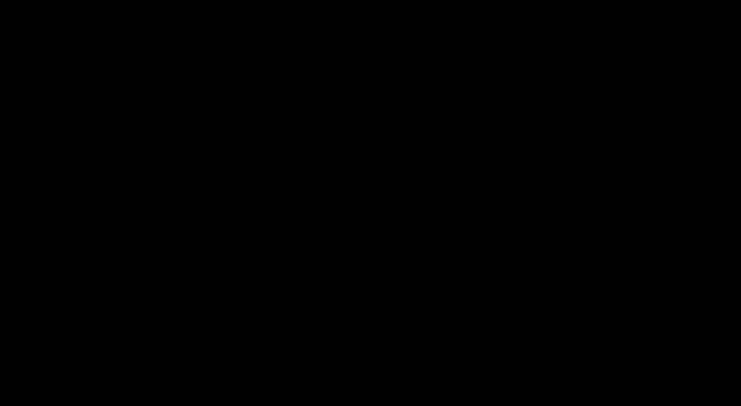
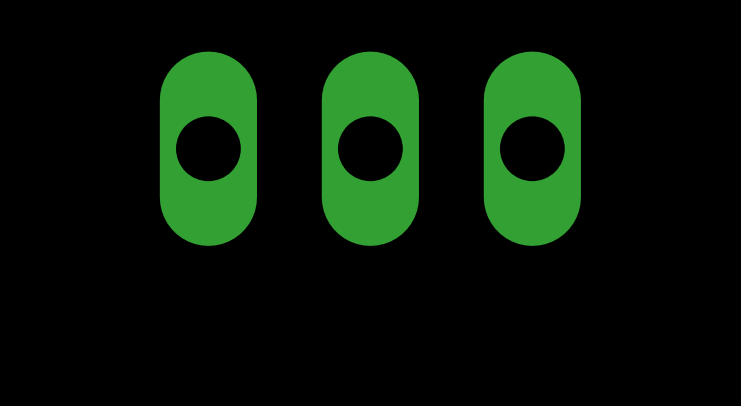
part: none -> (370, 148)

